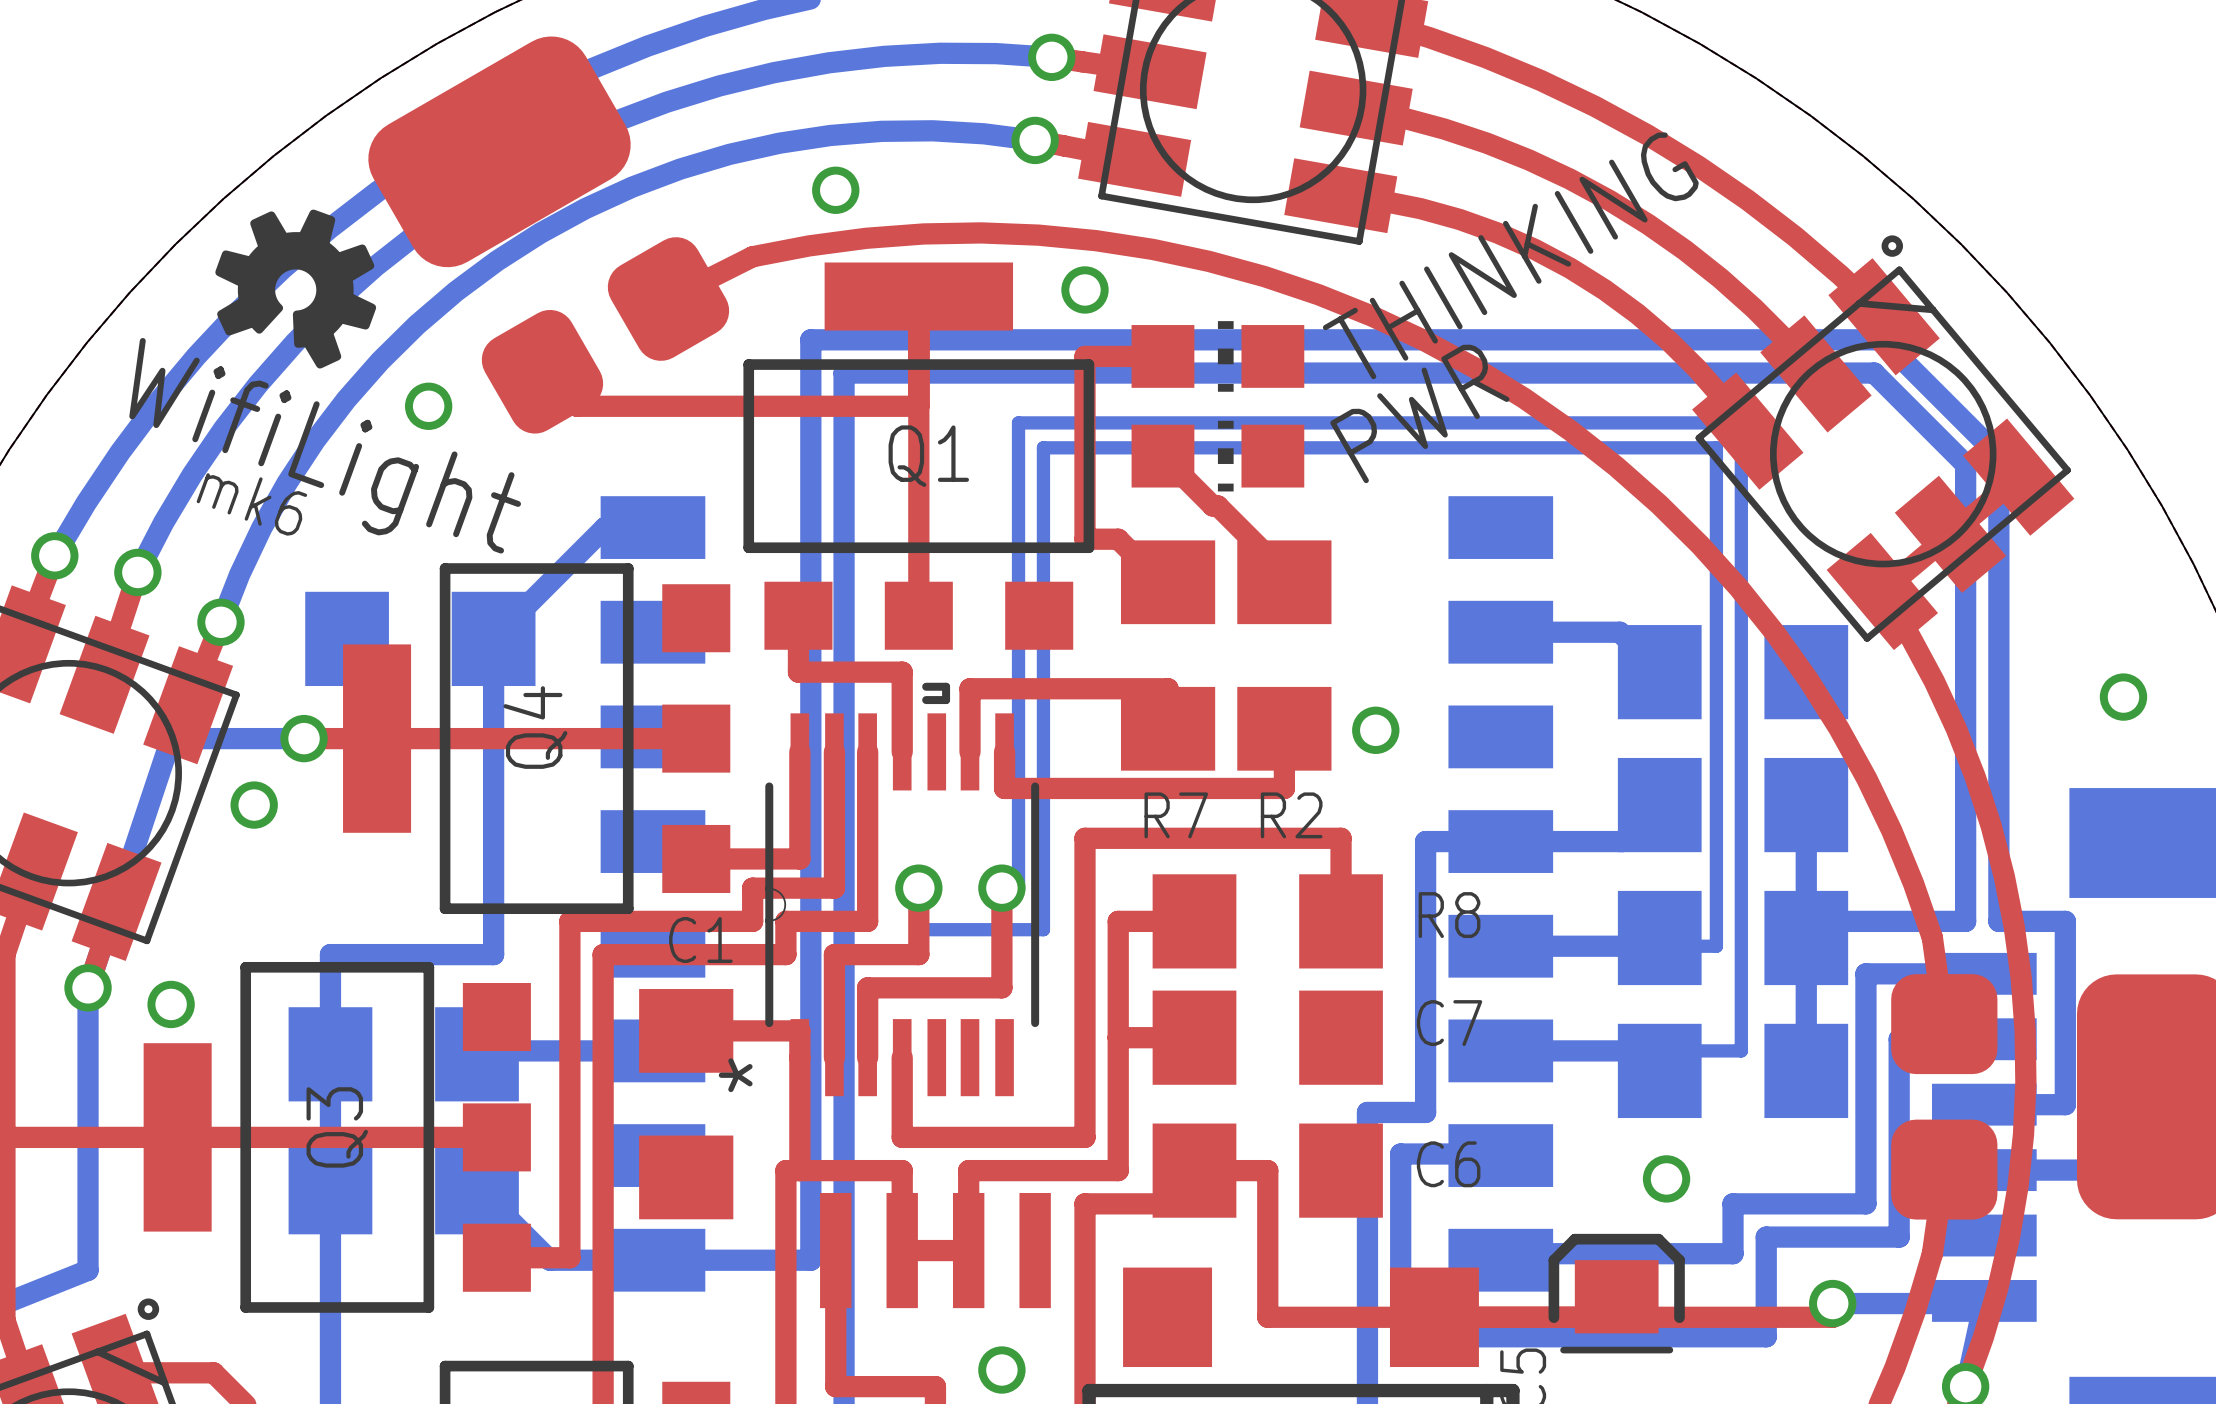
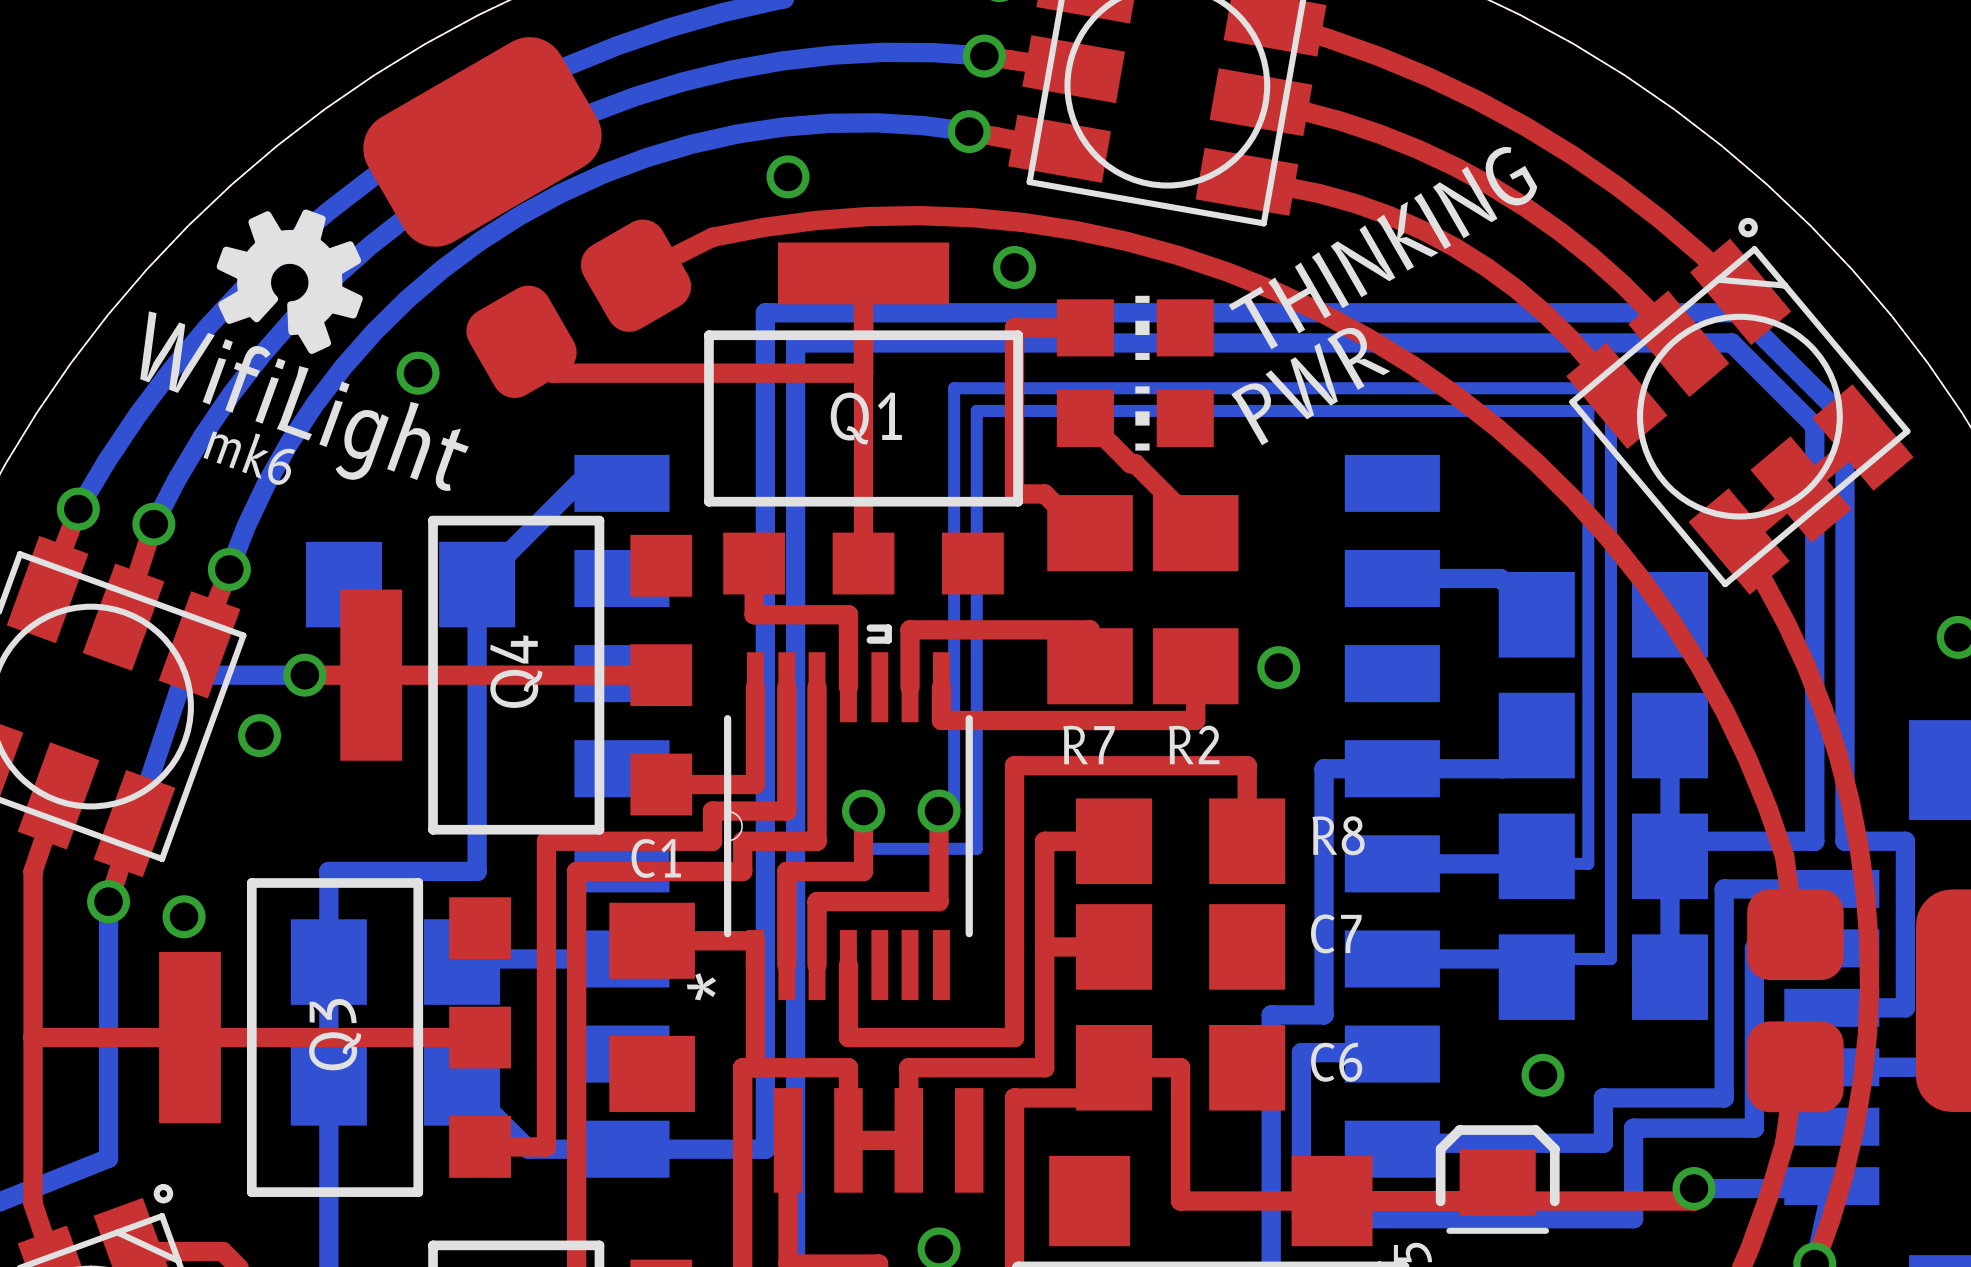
drawing position: (295, 289) -> (289, 281)

